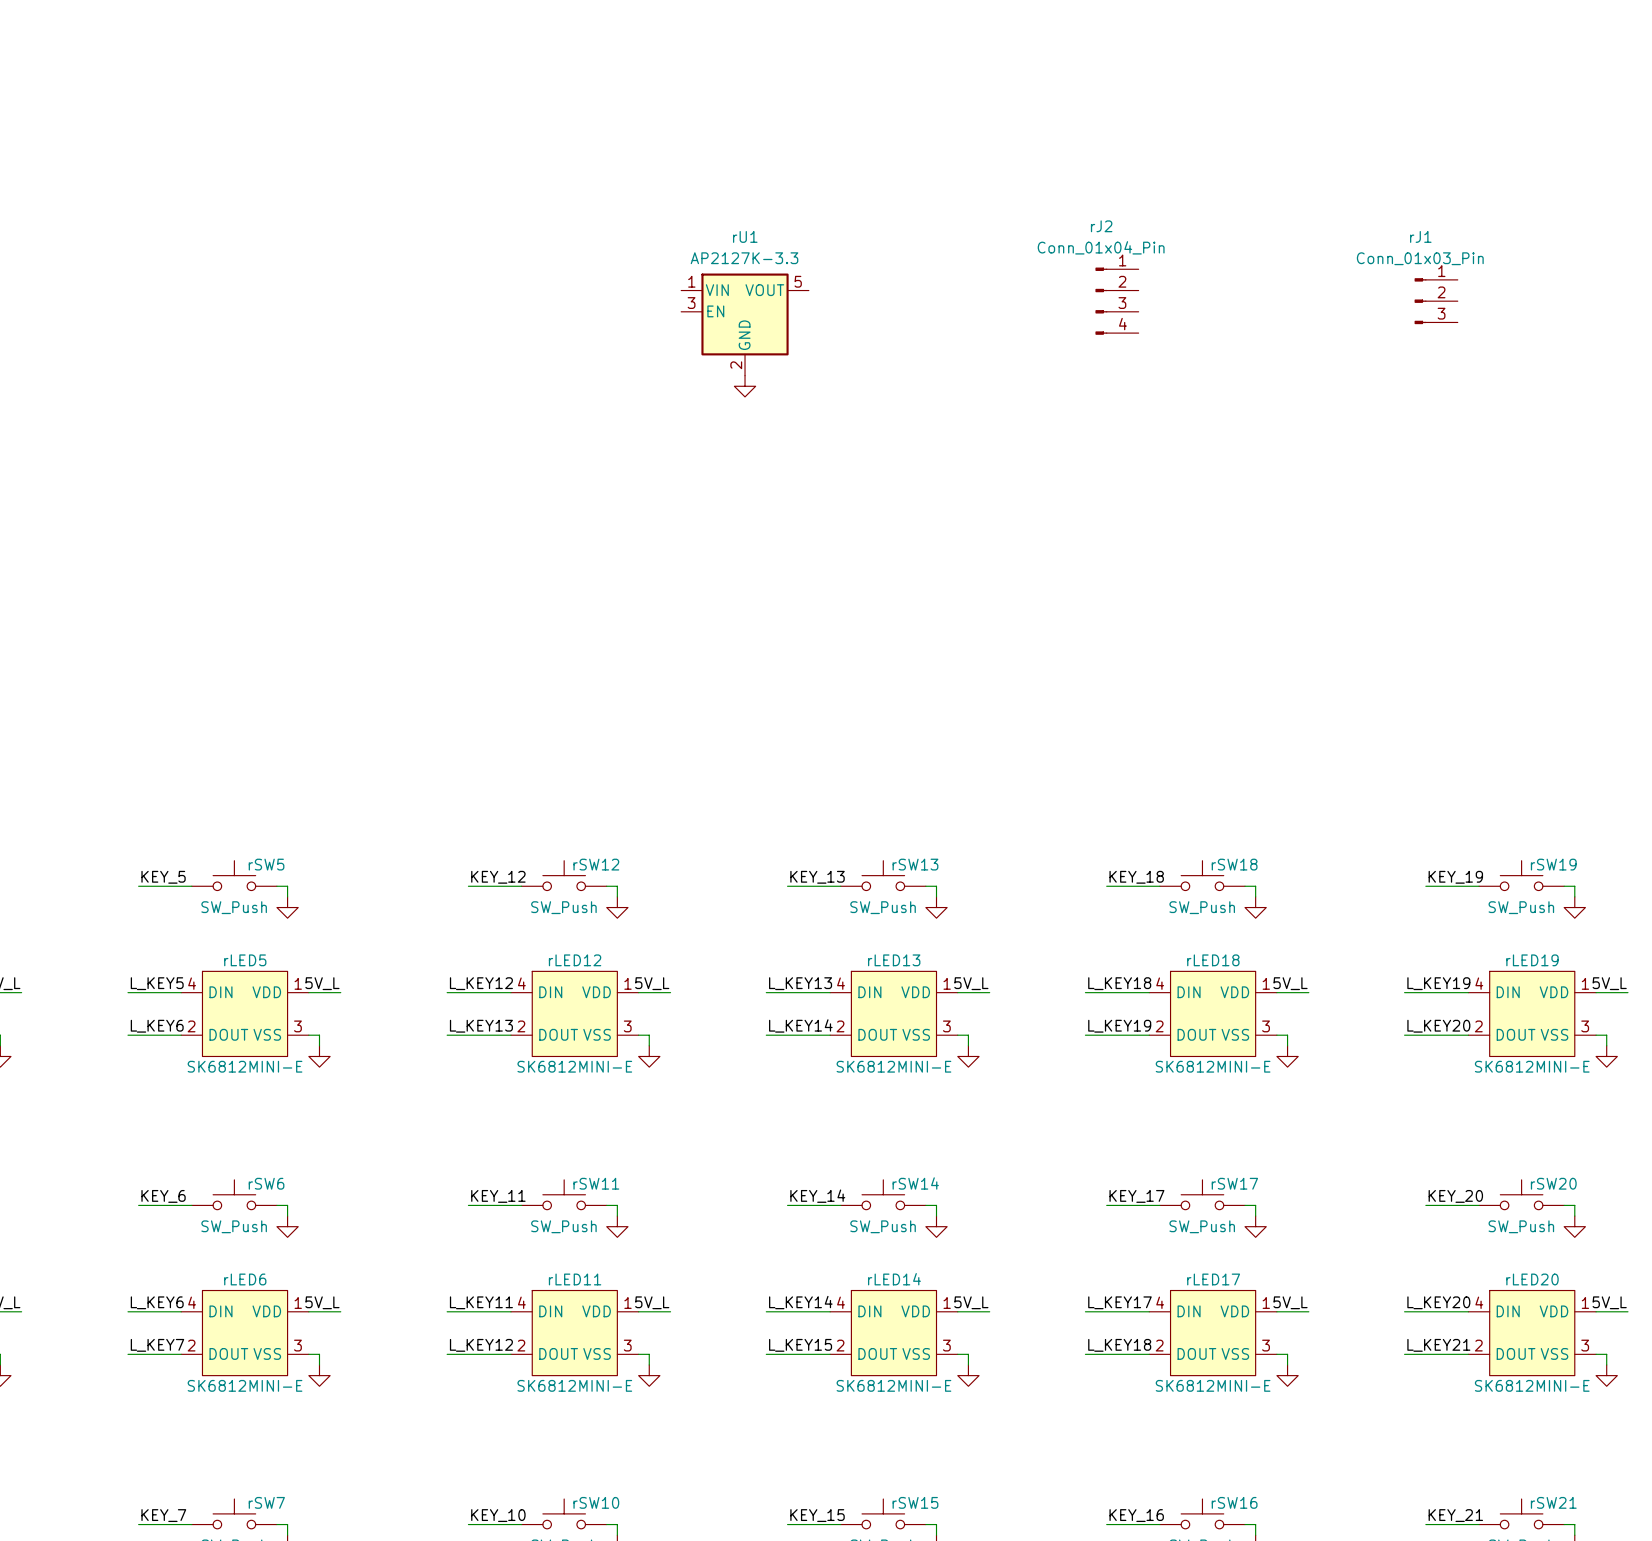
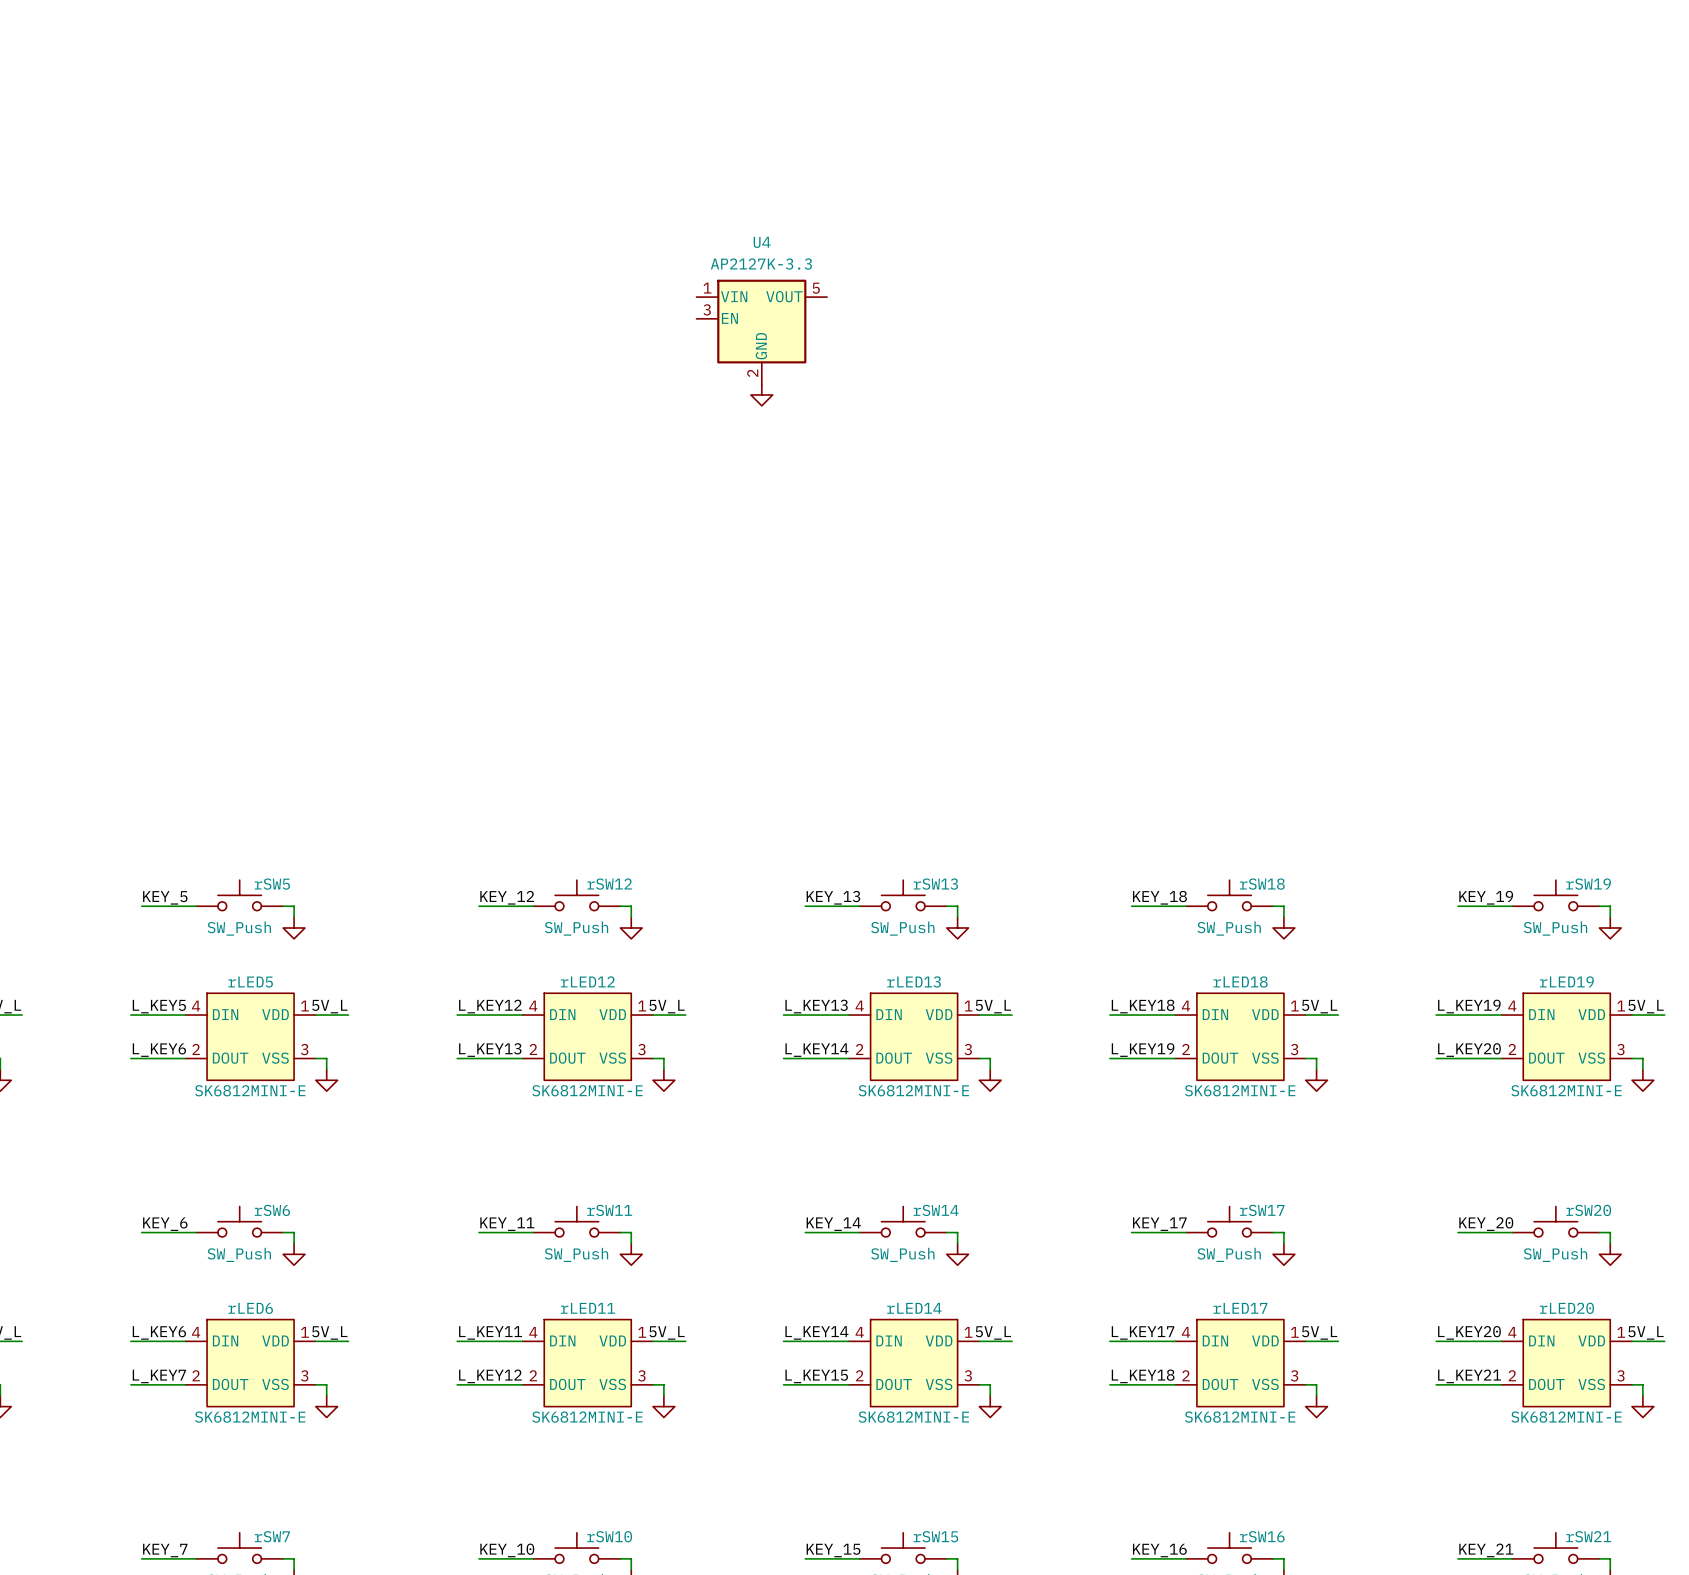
rU1 name: rU1 (745, 236) -> U4 (762, 242)
rJ2: Conn_01x04_Pin (1117, 301) -> none
rJ1: Conn_01x03_Pin (1436, 301) -> none

